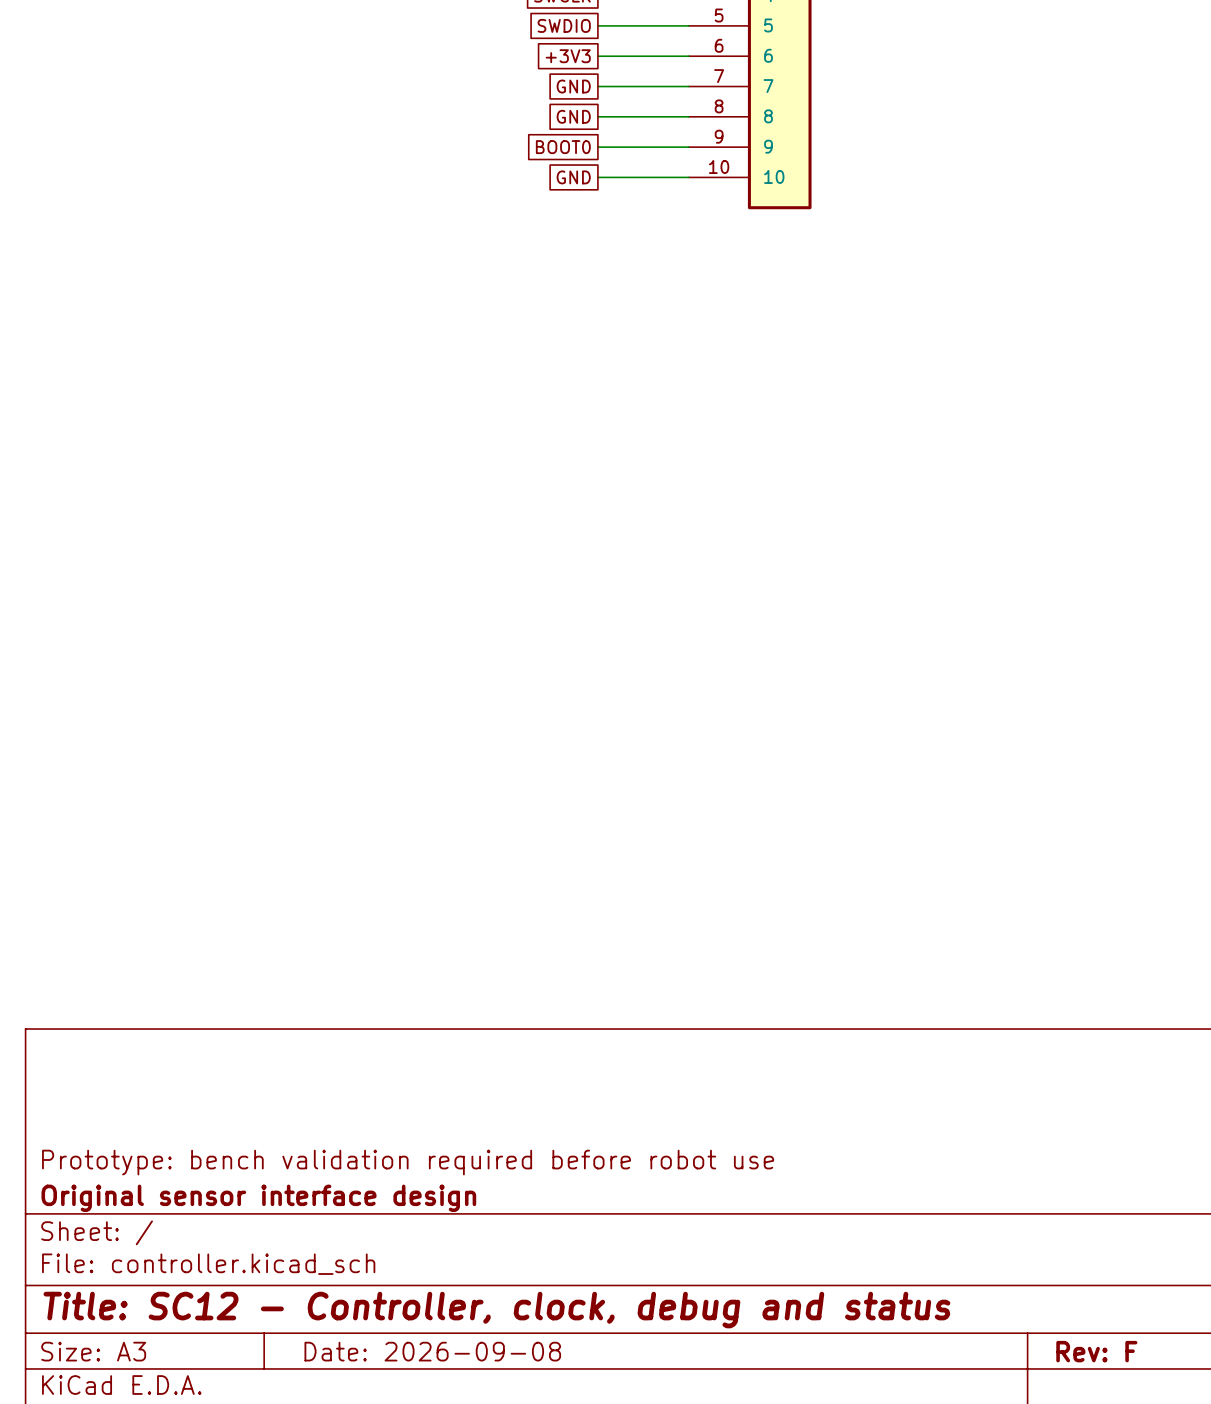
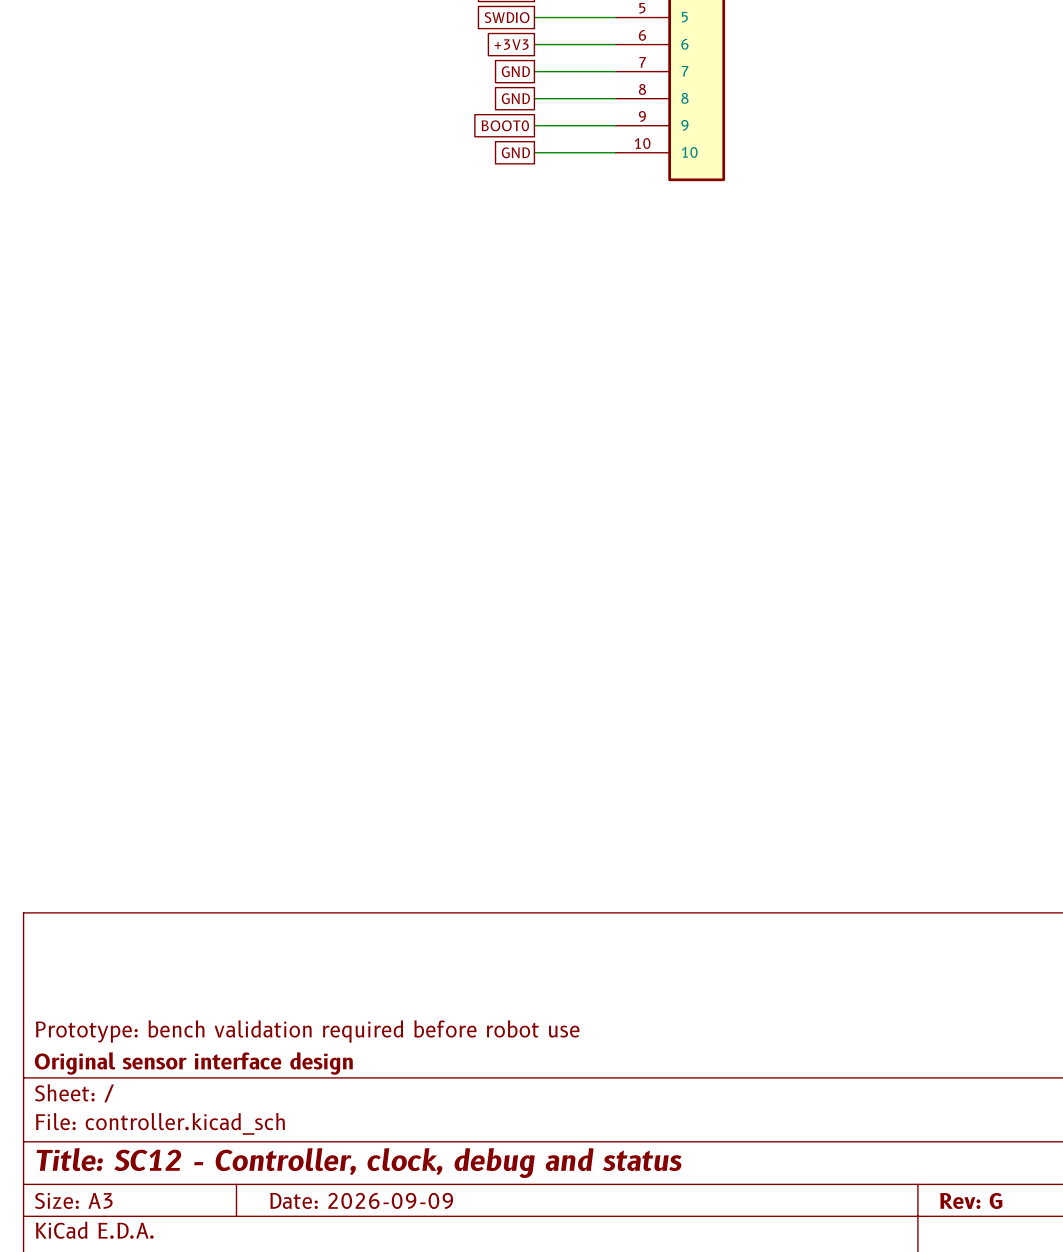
title block: Date: 2026-09-08 (432, 1351) -> Date: 2026-09-09 (361, 1200)
title block: Rev: F (1096, 1351) -> Rev: G (971, 1201)

